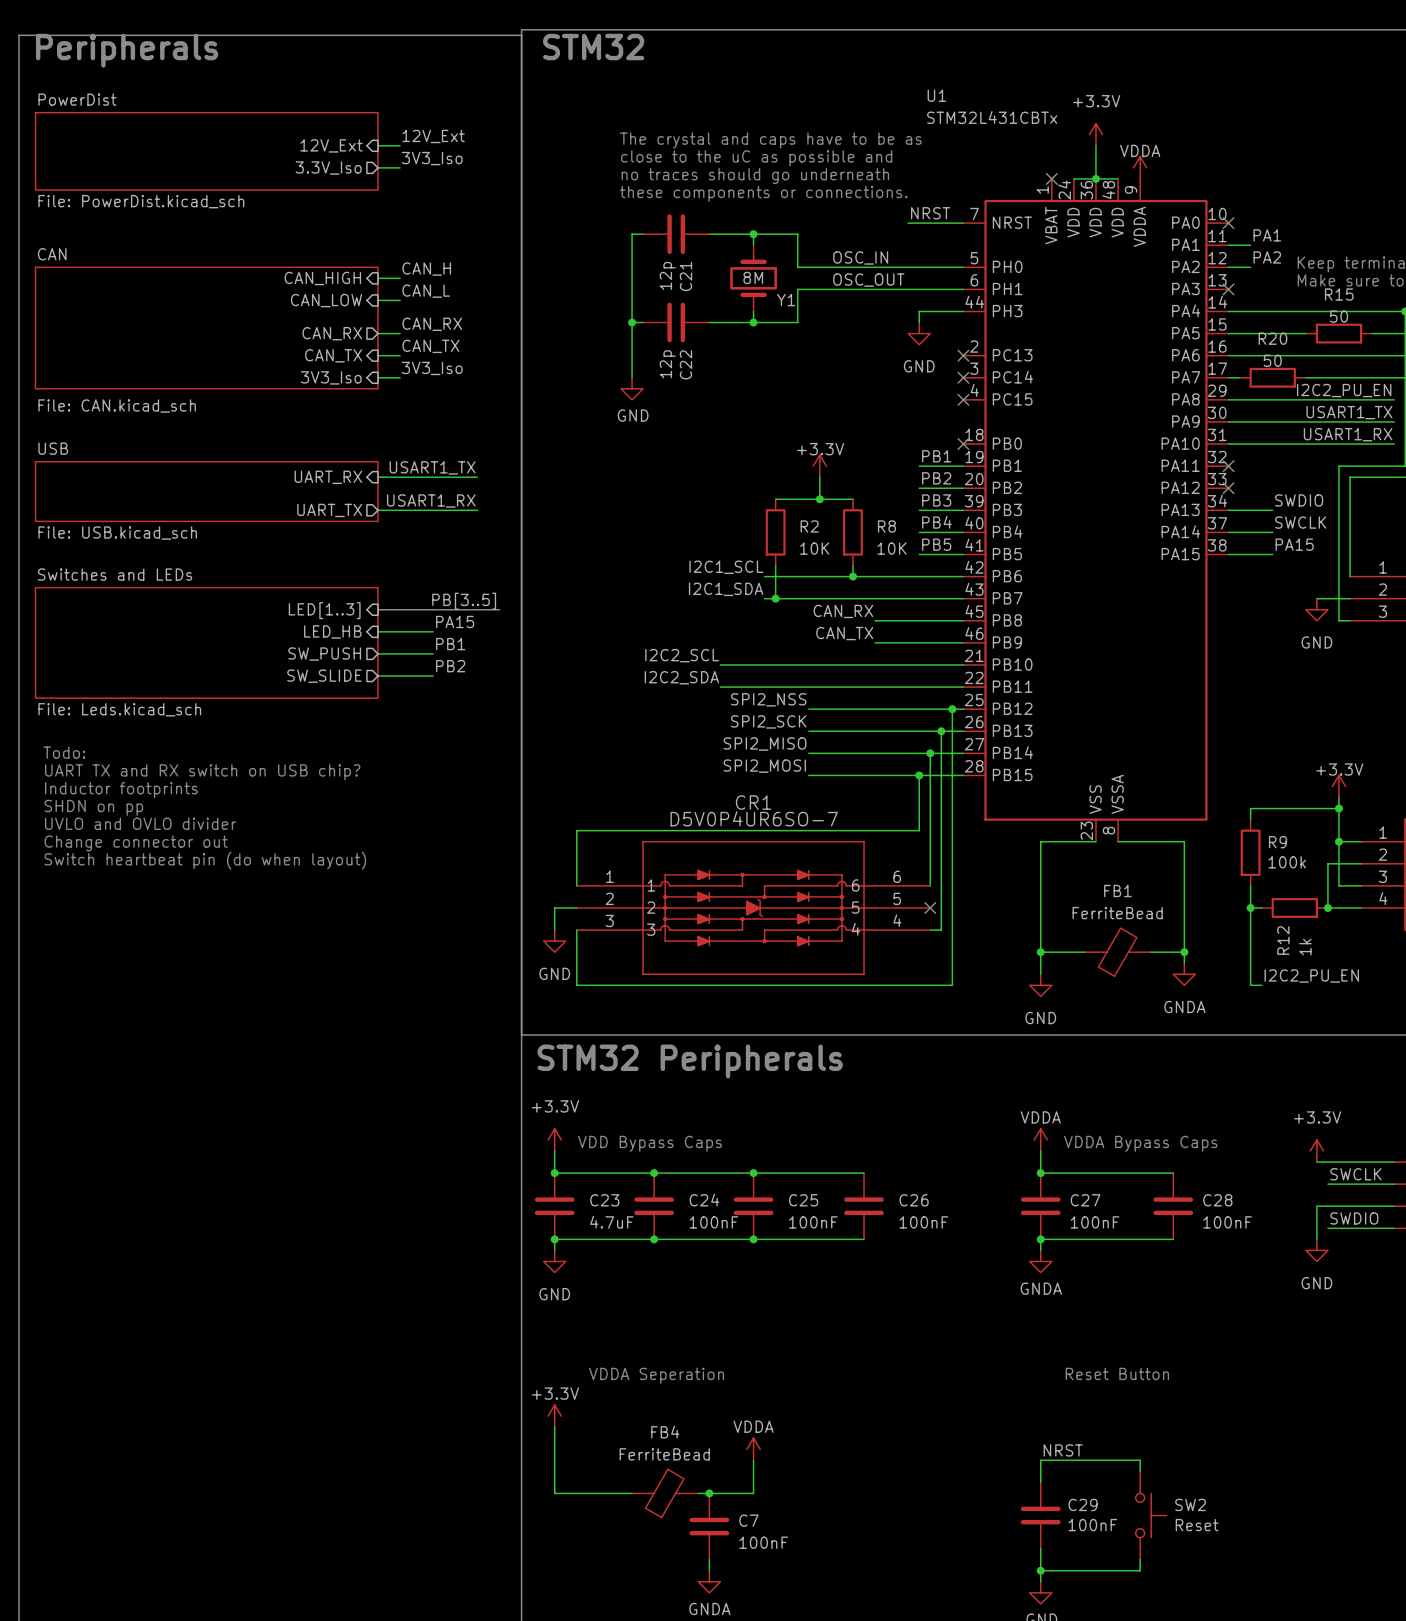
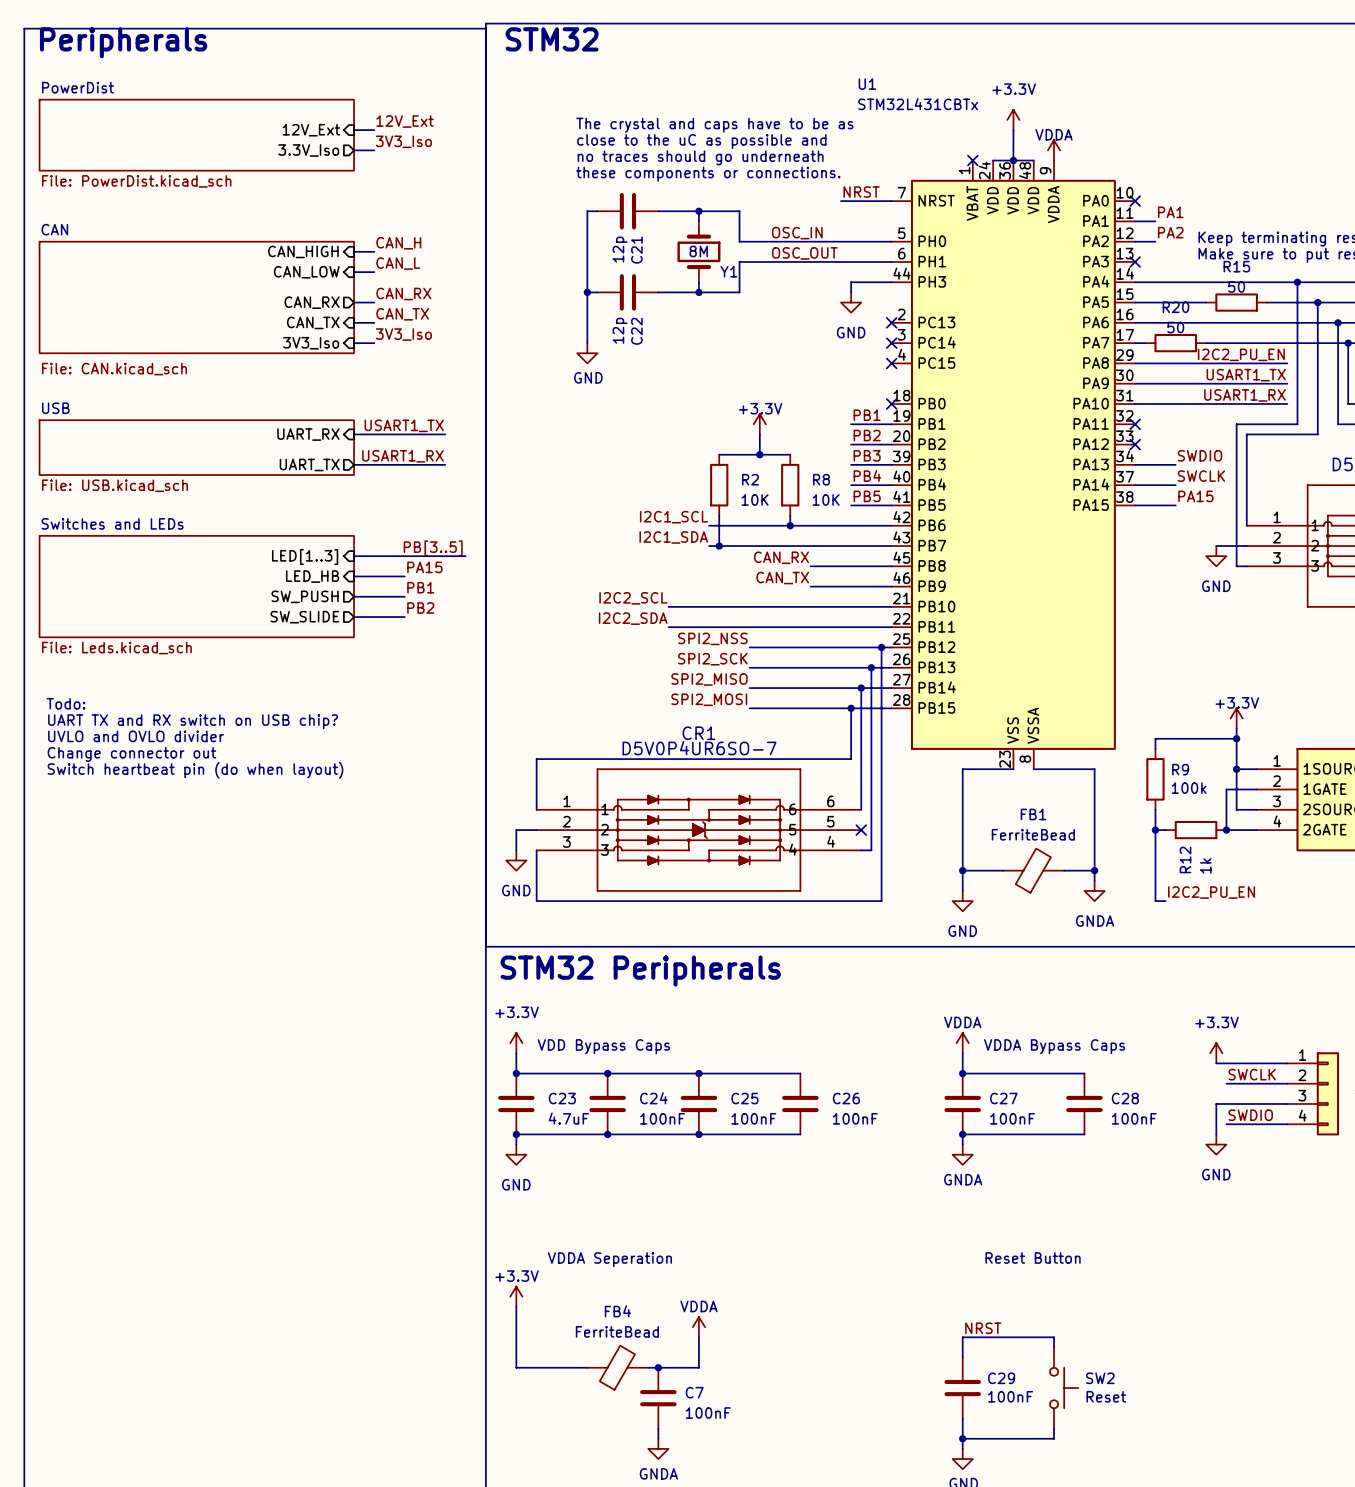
text: Todo: (64, 752) -> none
text: UART TX and RX switch on USB chip? (202, 772) -> Todo: (66, 703)
text: Inductor footprints (121, 790) -> UART TX and RX switch on USB chip? (193, 721)
text: SHDN on pp (93, 807) -> UVLO and OVLO divider (136, 736)
text: UVLO and OVLO divider (140, 823) -> Change connector out (131, 754)
text: Change connector out (136, 843) -> Switch heartbeat pin (do when layout) (195, 770)
text: Switch heartbeat pin (do when layout) (205, 860) -> none

